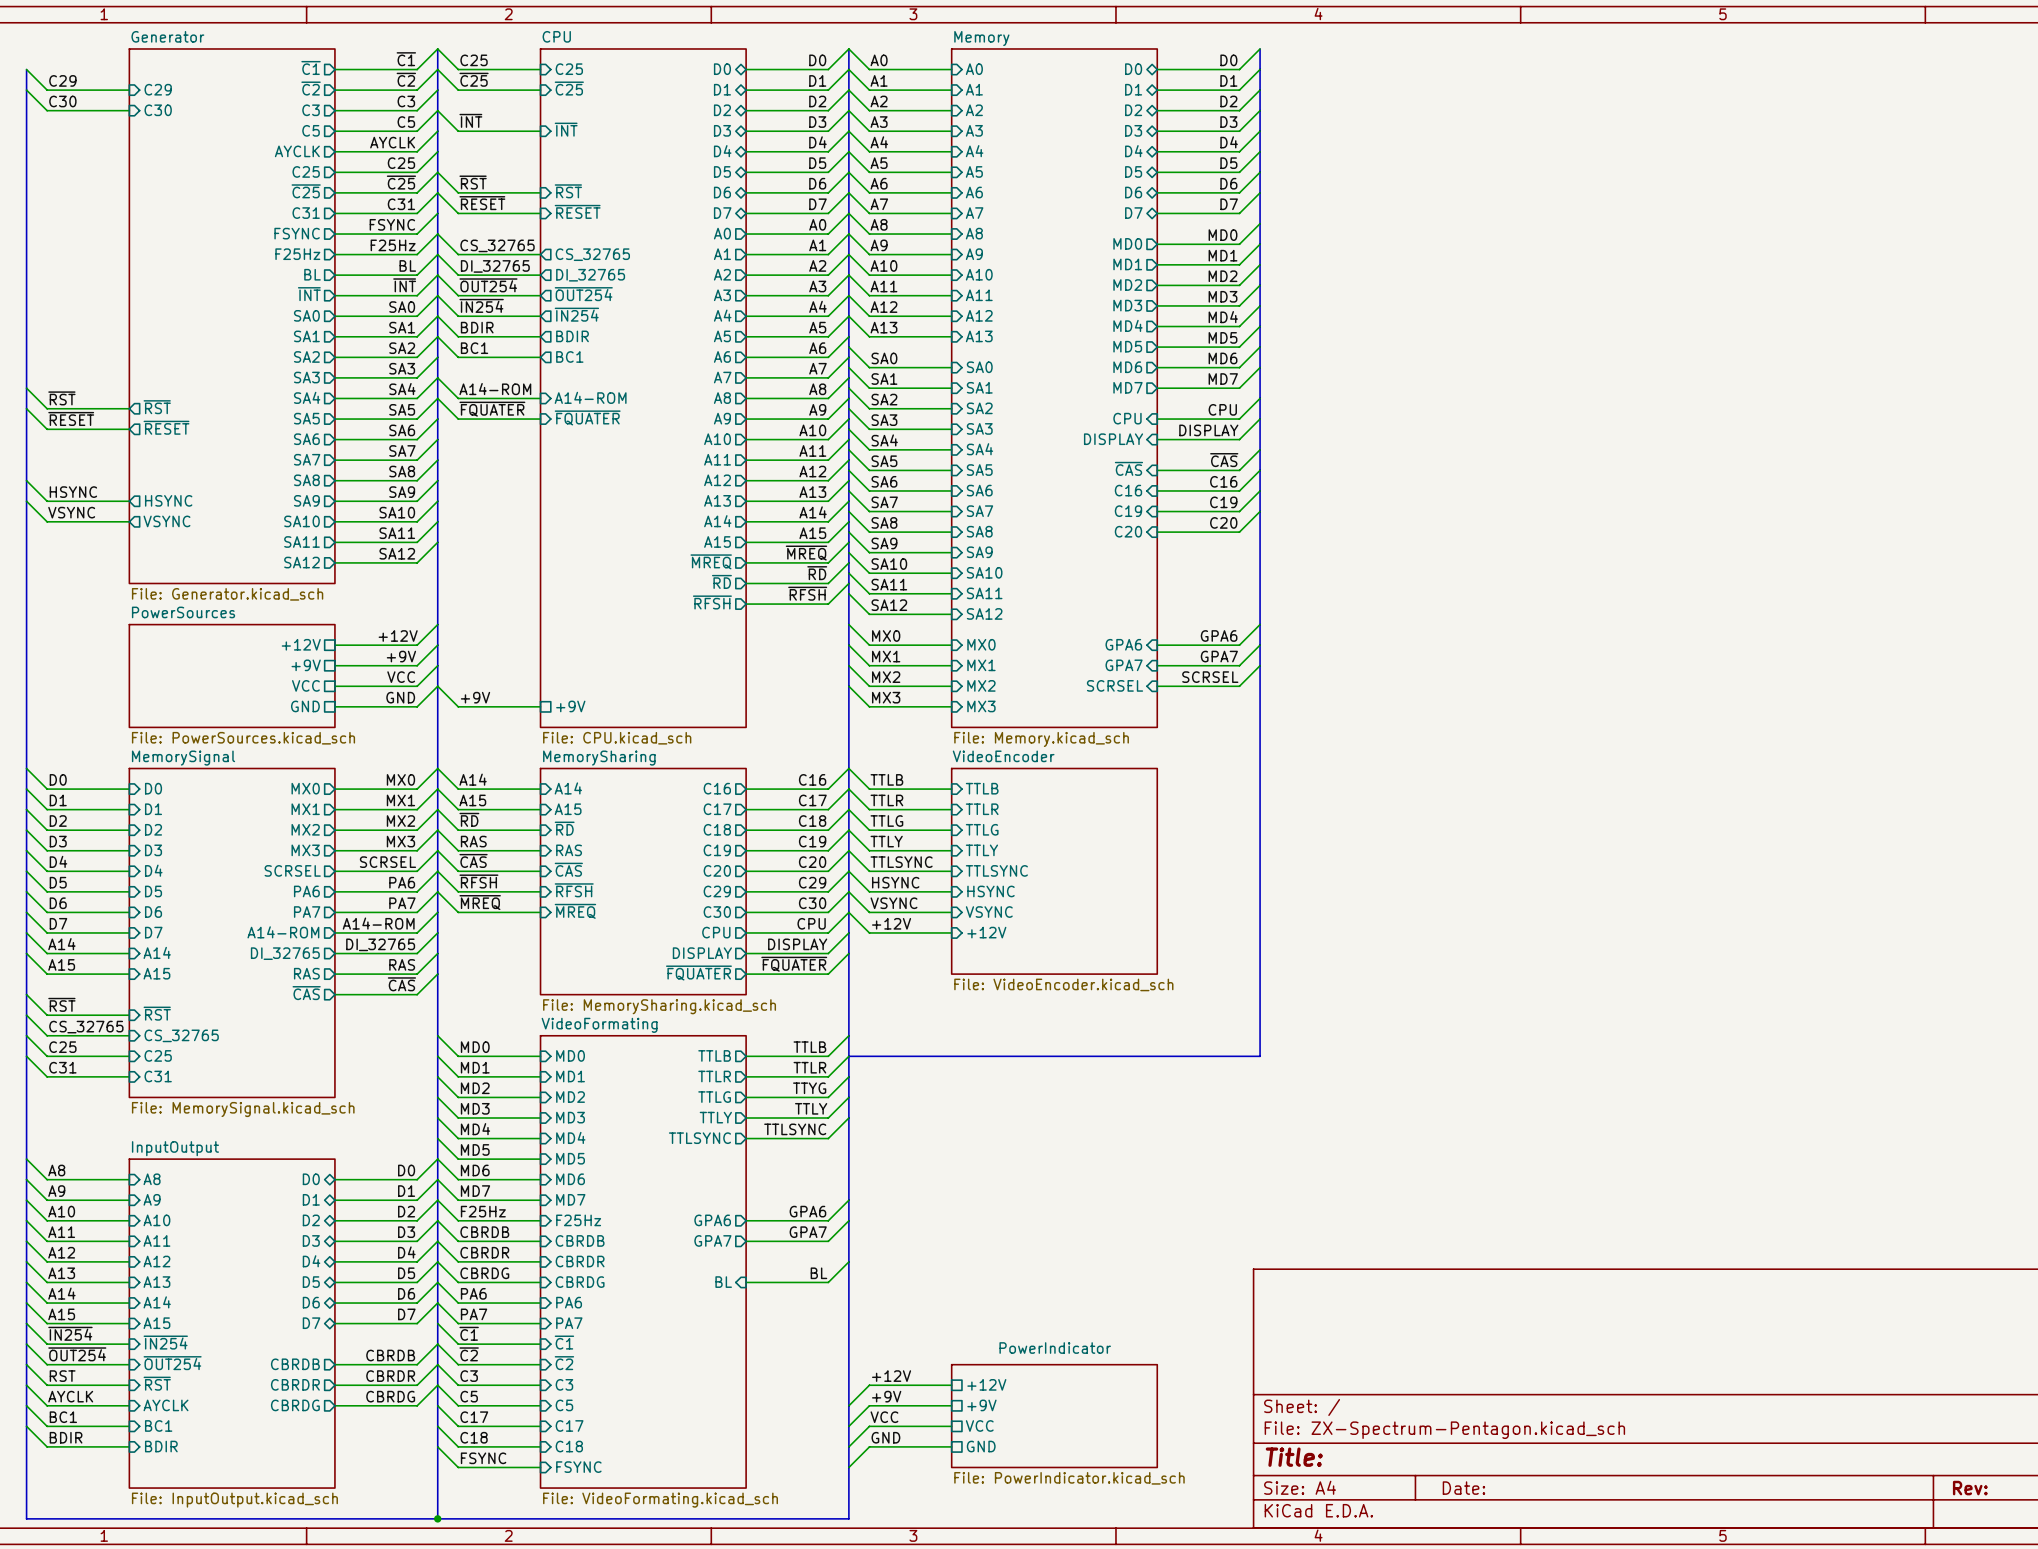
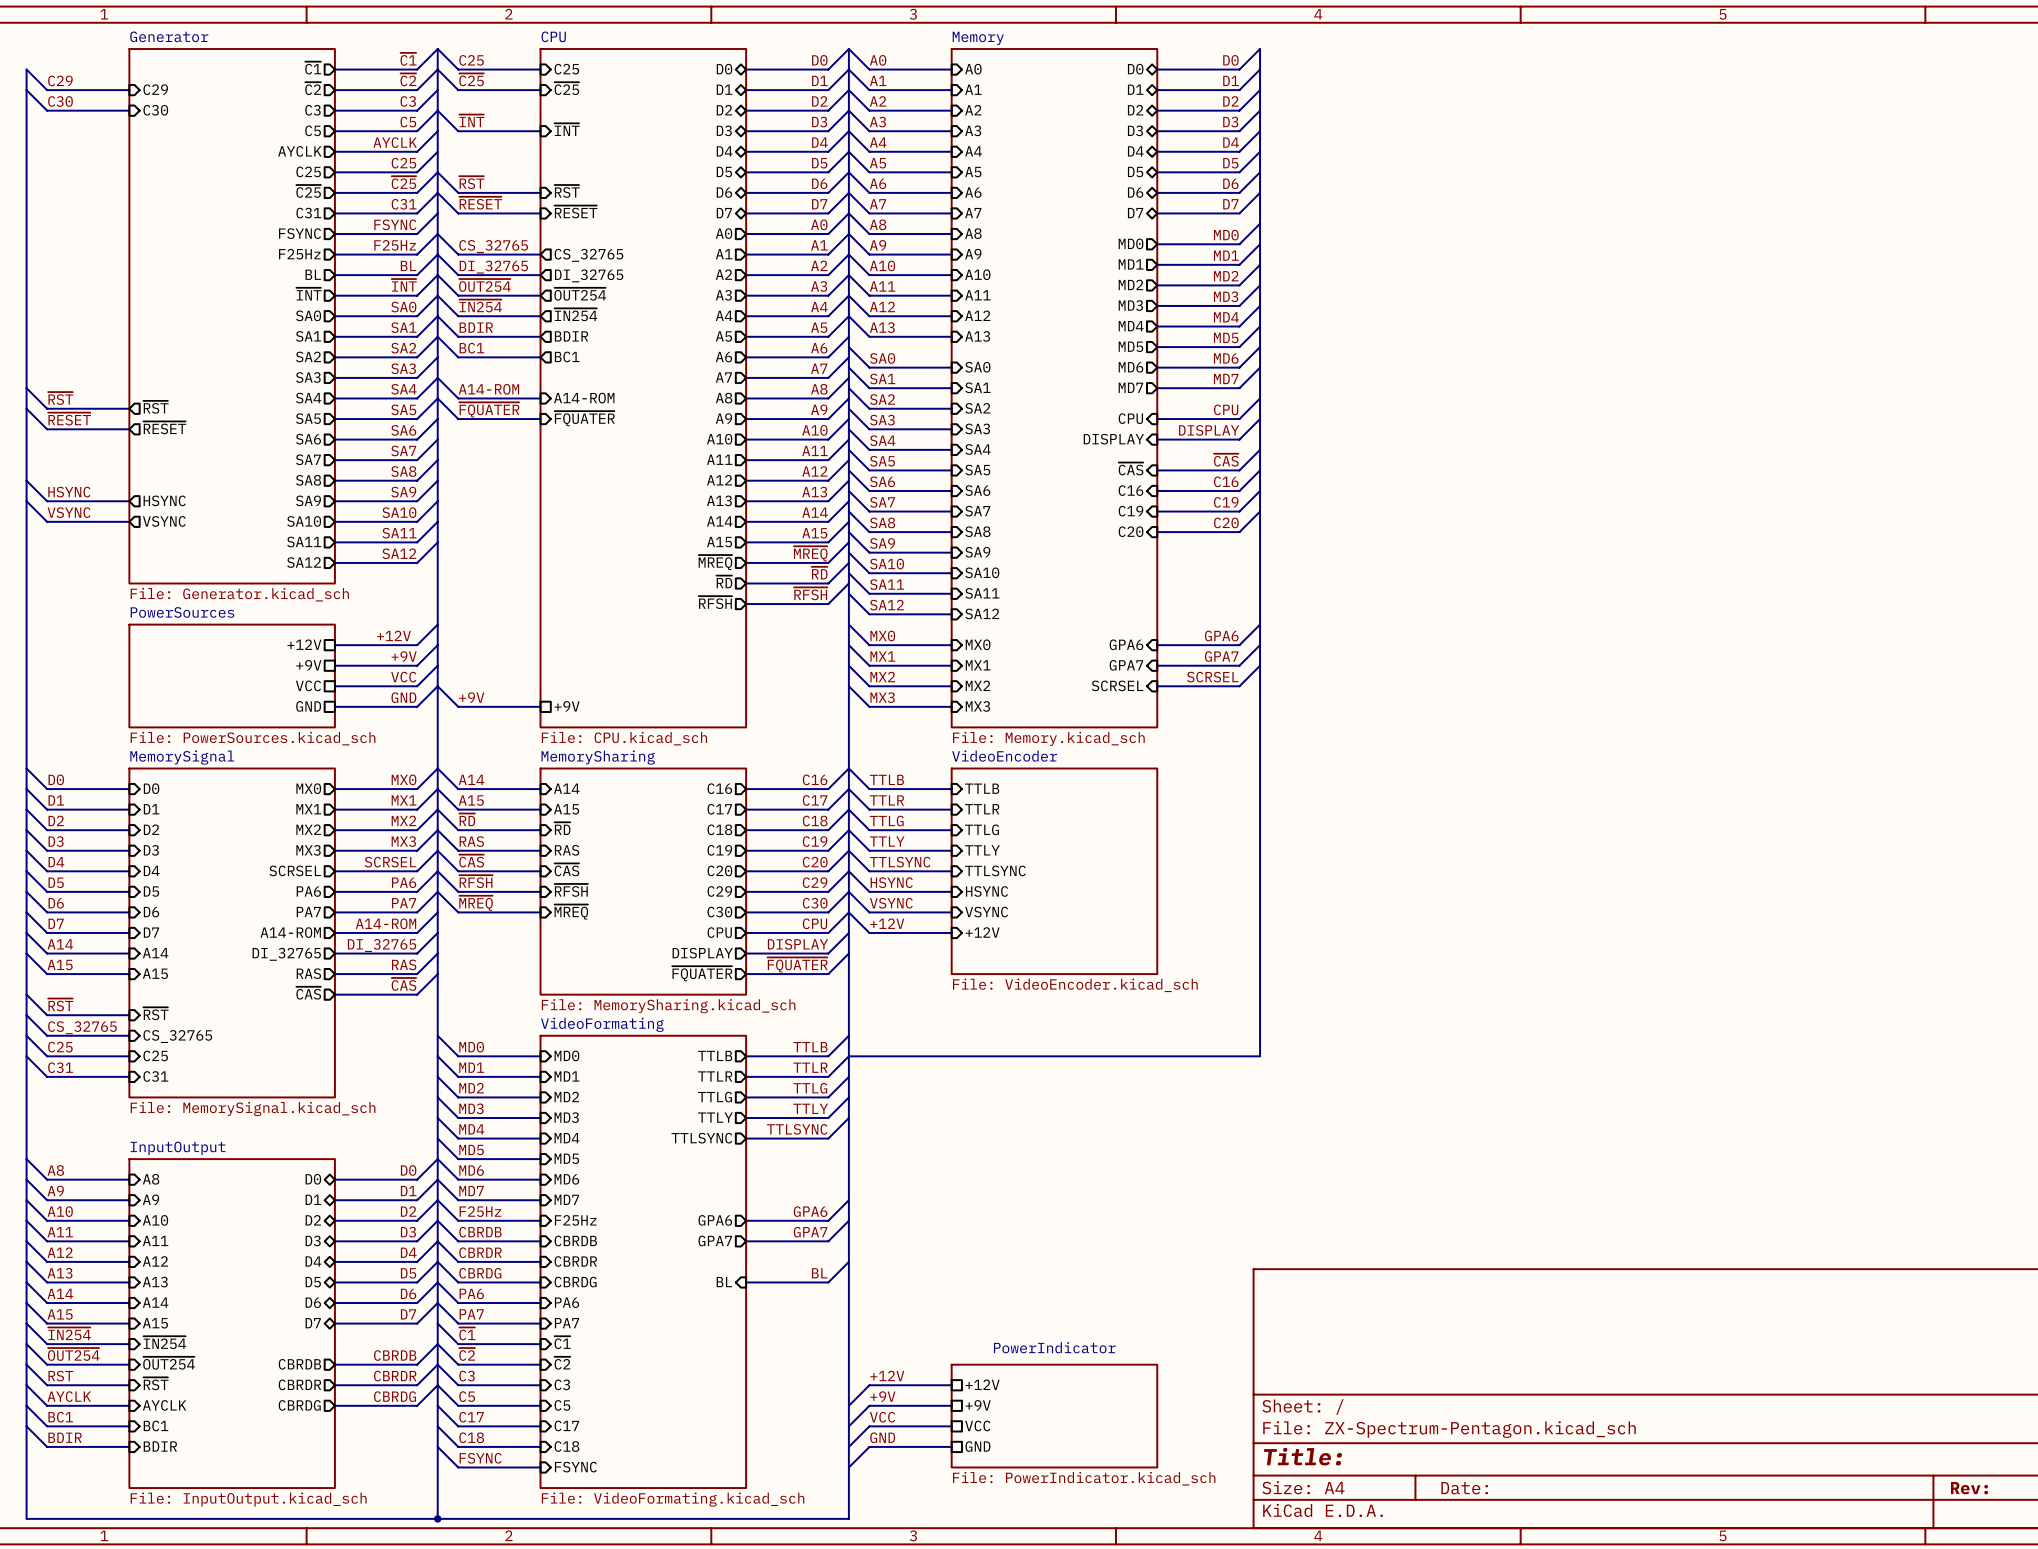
label: TTYG (809, 1088) -> TTLG (810, 1088)

